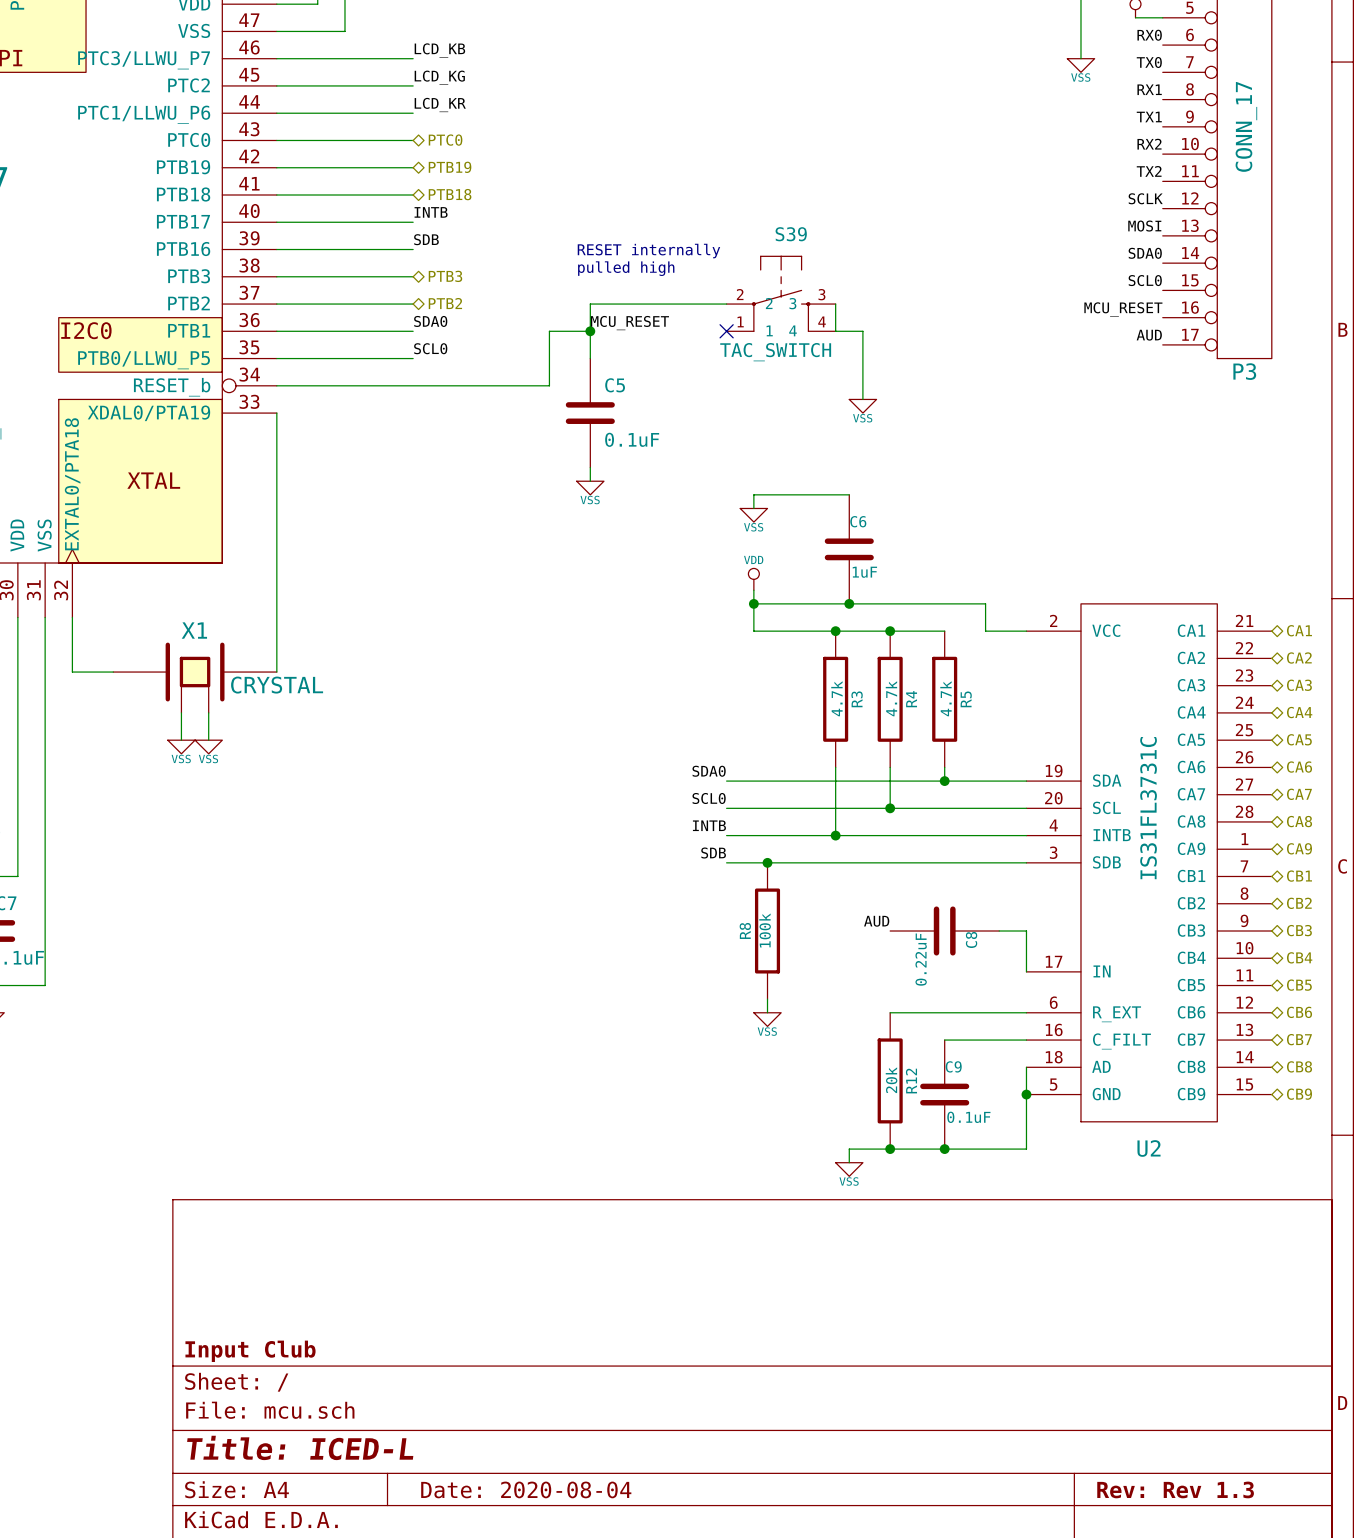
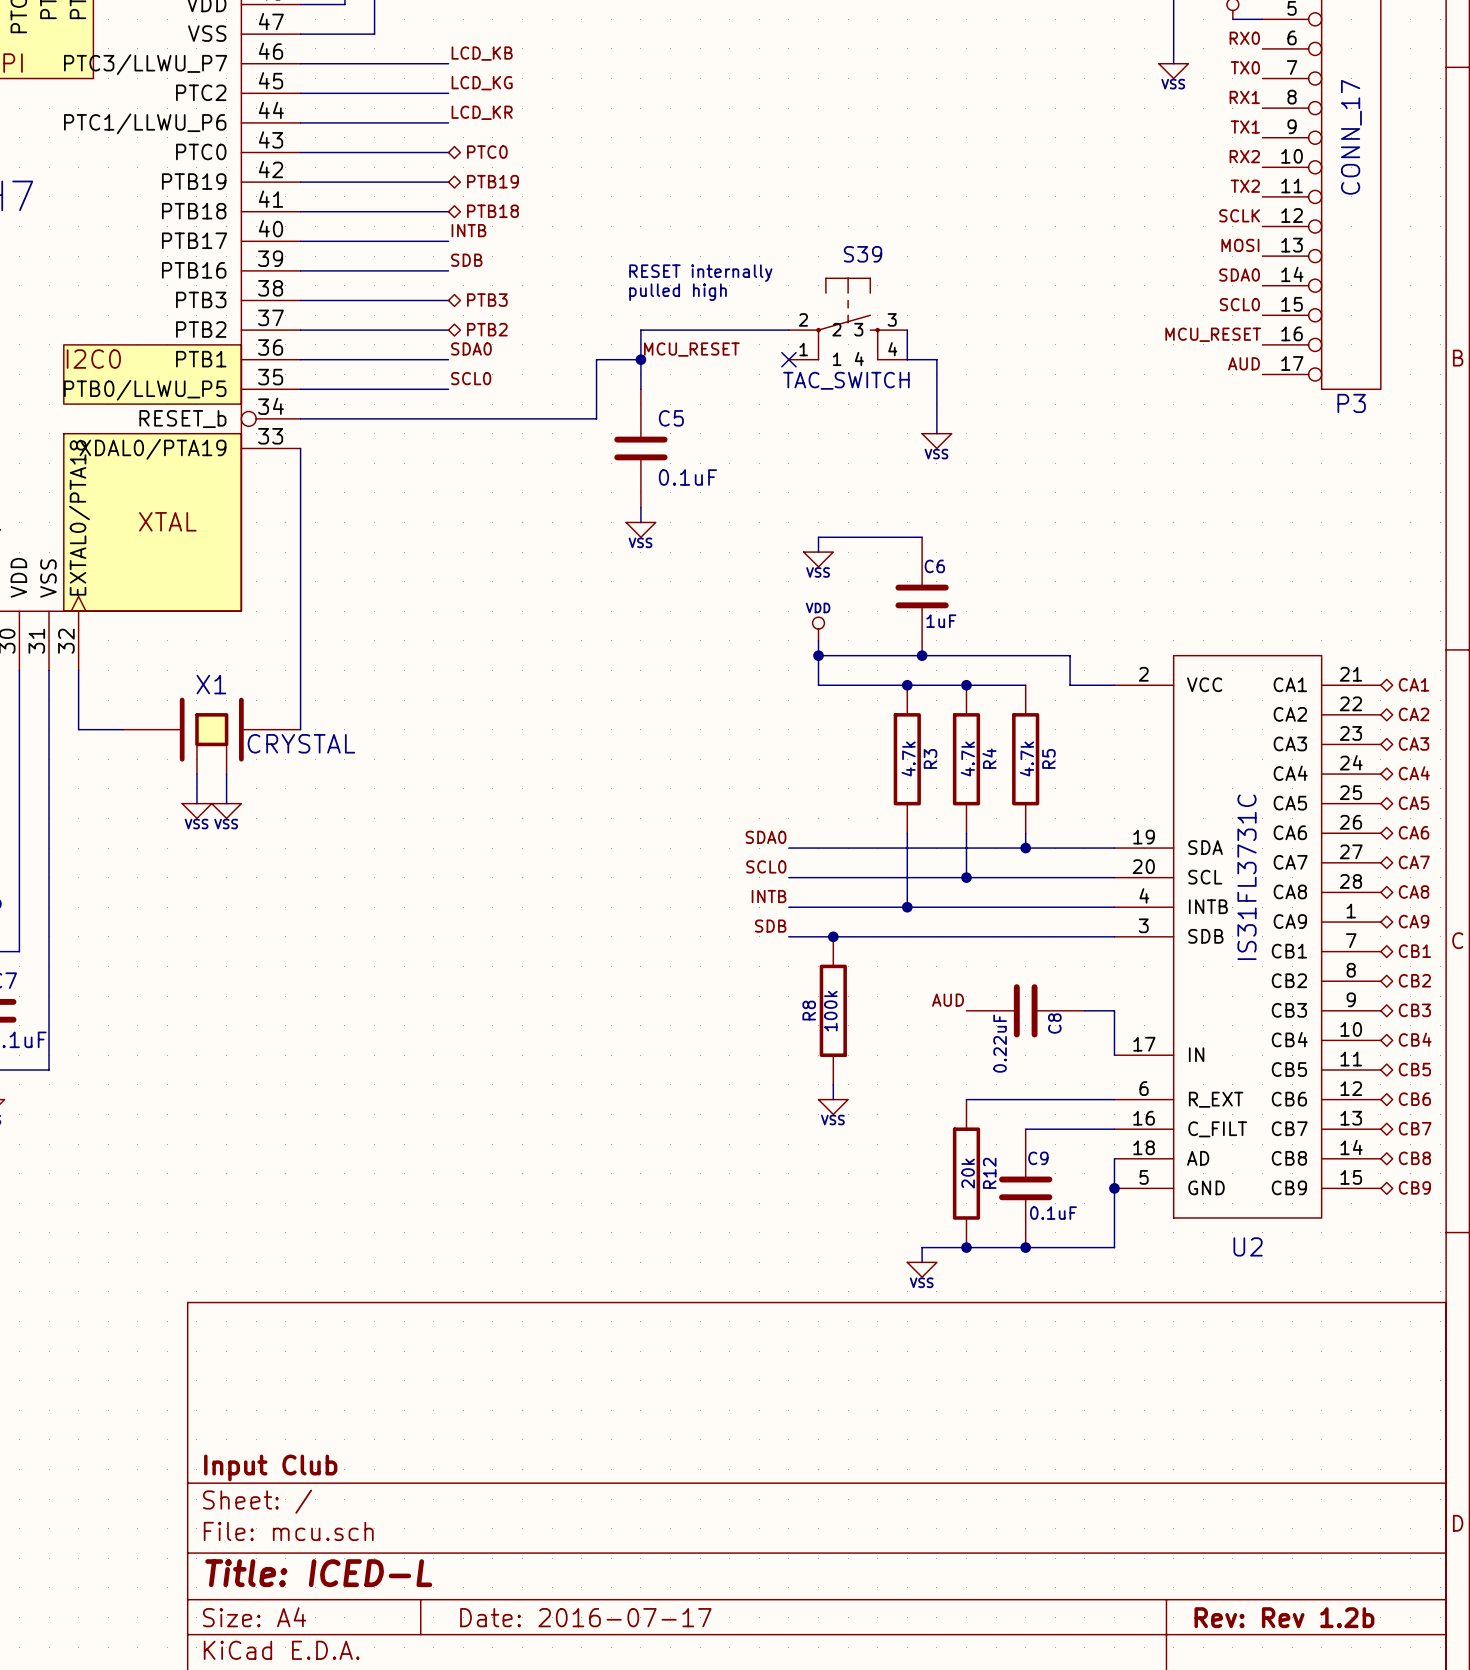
title block: Date: 2020-08-04 (526, 1489) -> Date: 2016-07-17 (585, 1617)
title block: Rev: Rev 1.3 (1175, 1489) -> Rev: Rev 1.2b (1284, 1617)

